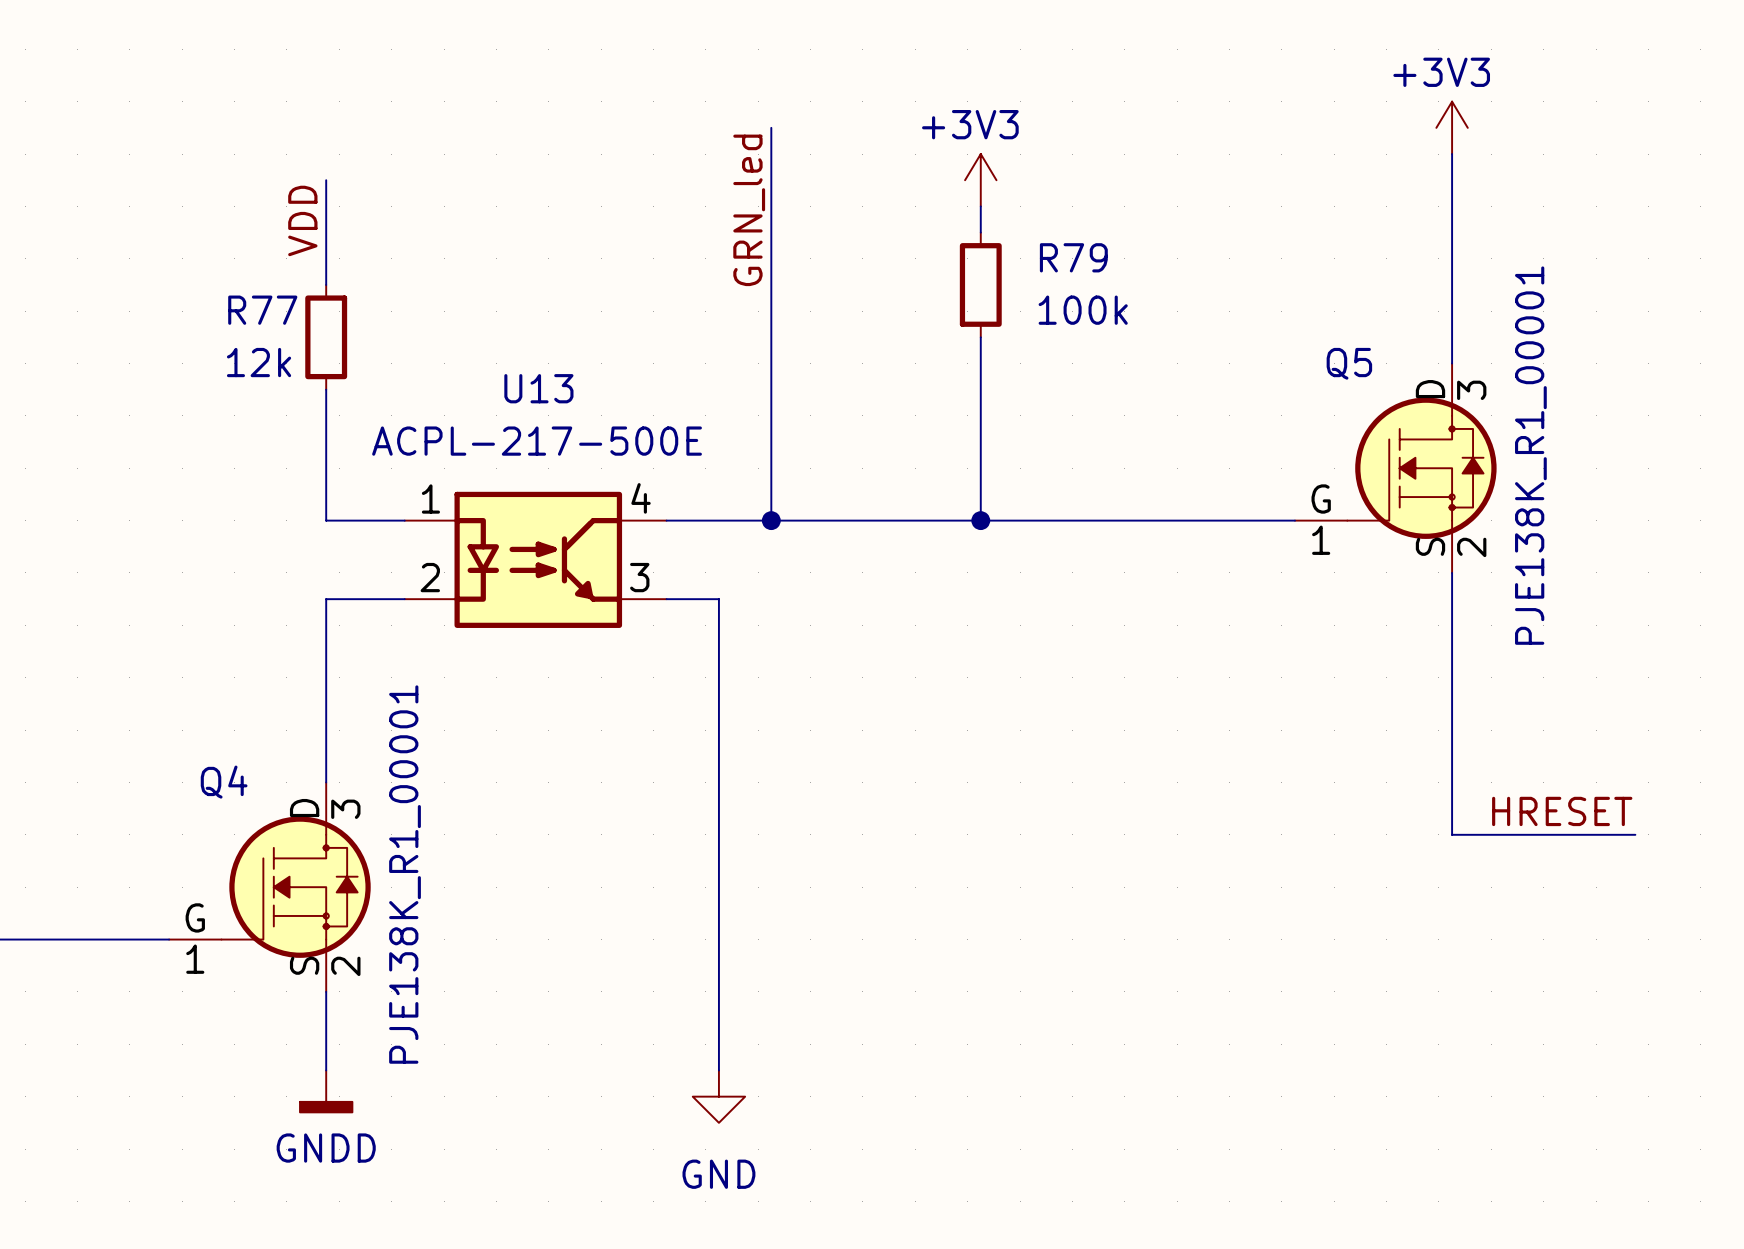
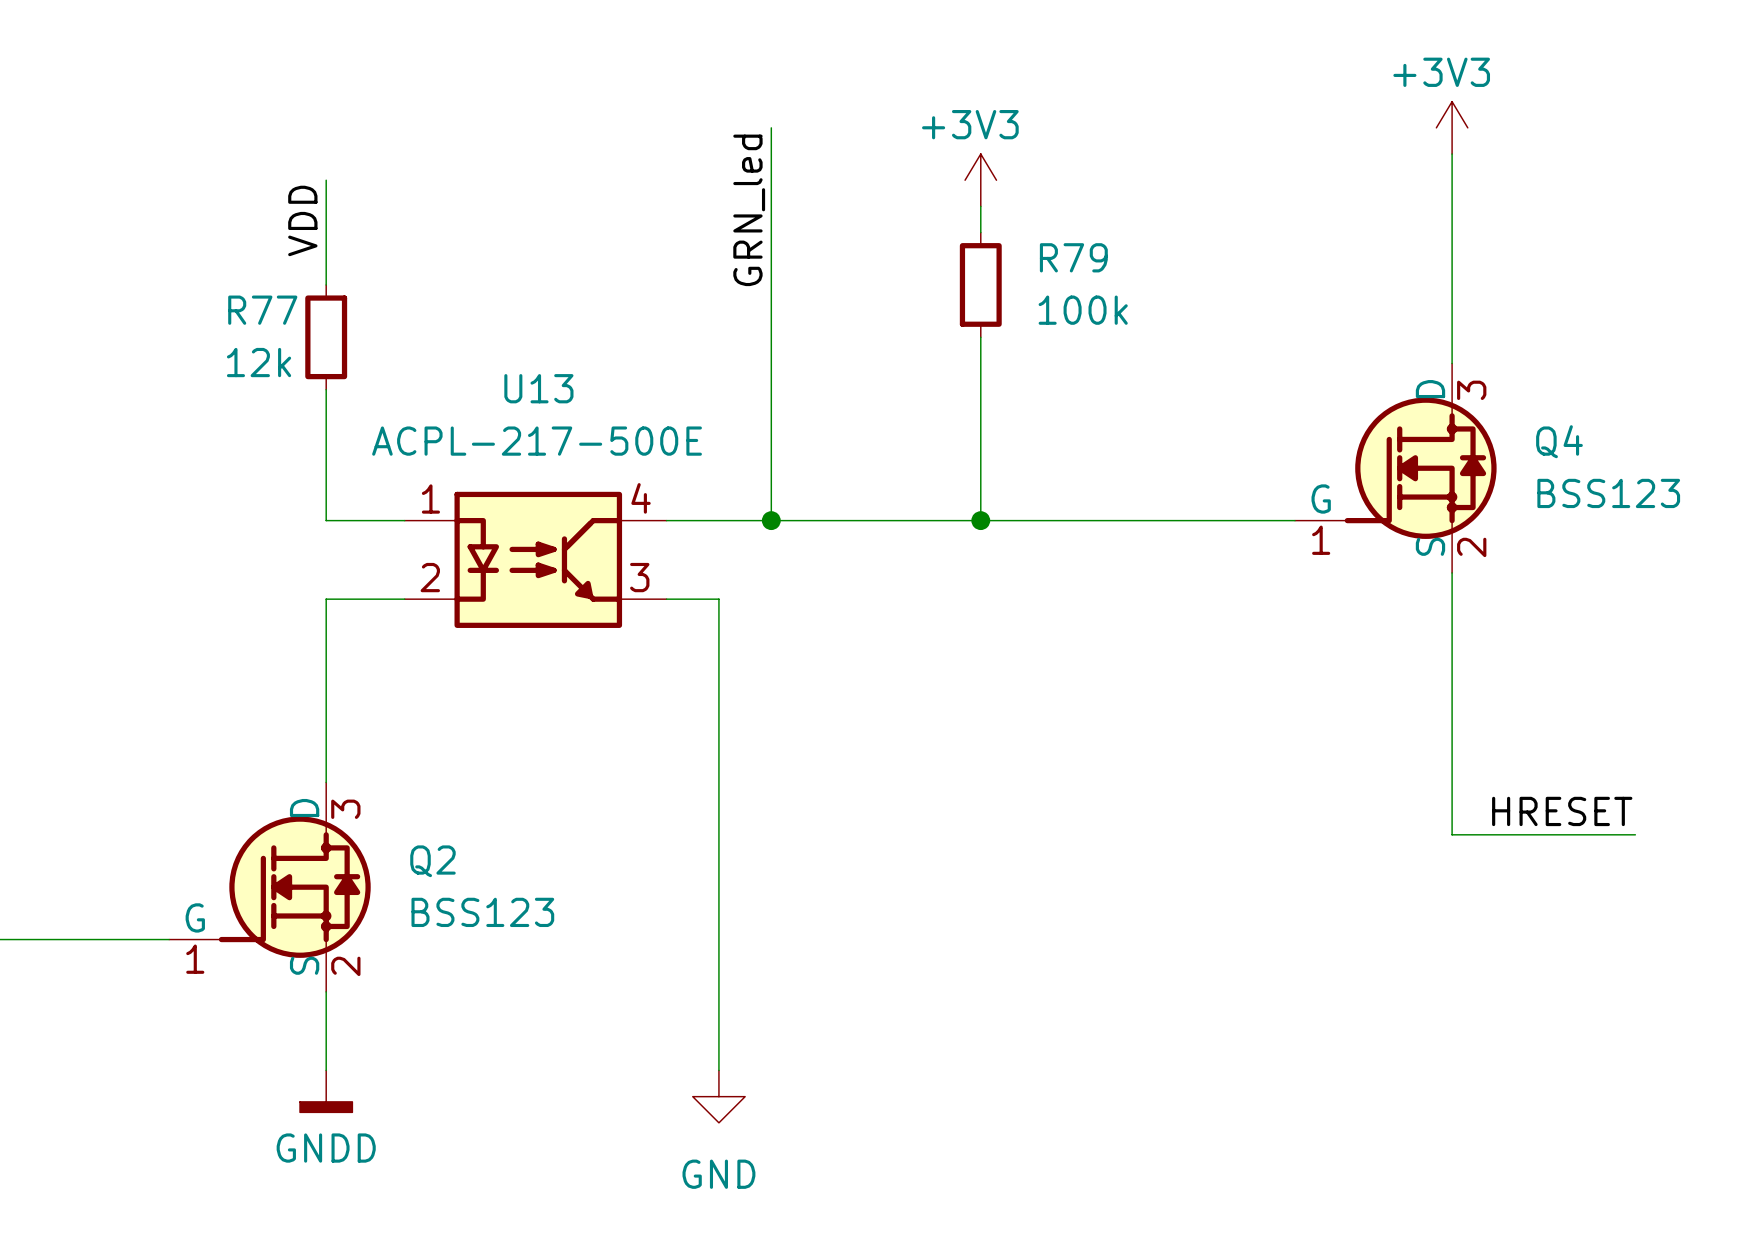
Q5: (1395, 468) -> none
Q4 symbol: [169, 782, 371, 992] -> [1294, 363, 1497, 573]
Q4 name position: Q4 (224, 782) -> Q4 (1559, 441)
Q4 text: PJE138K_R1_00001 (405, 874) -> BSS123 (1608, 493)
Q2: none -> (269, 887)

